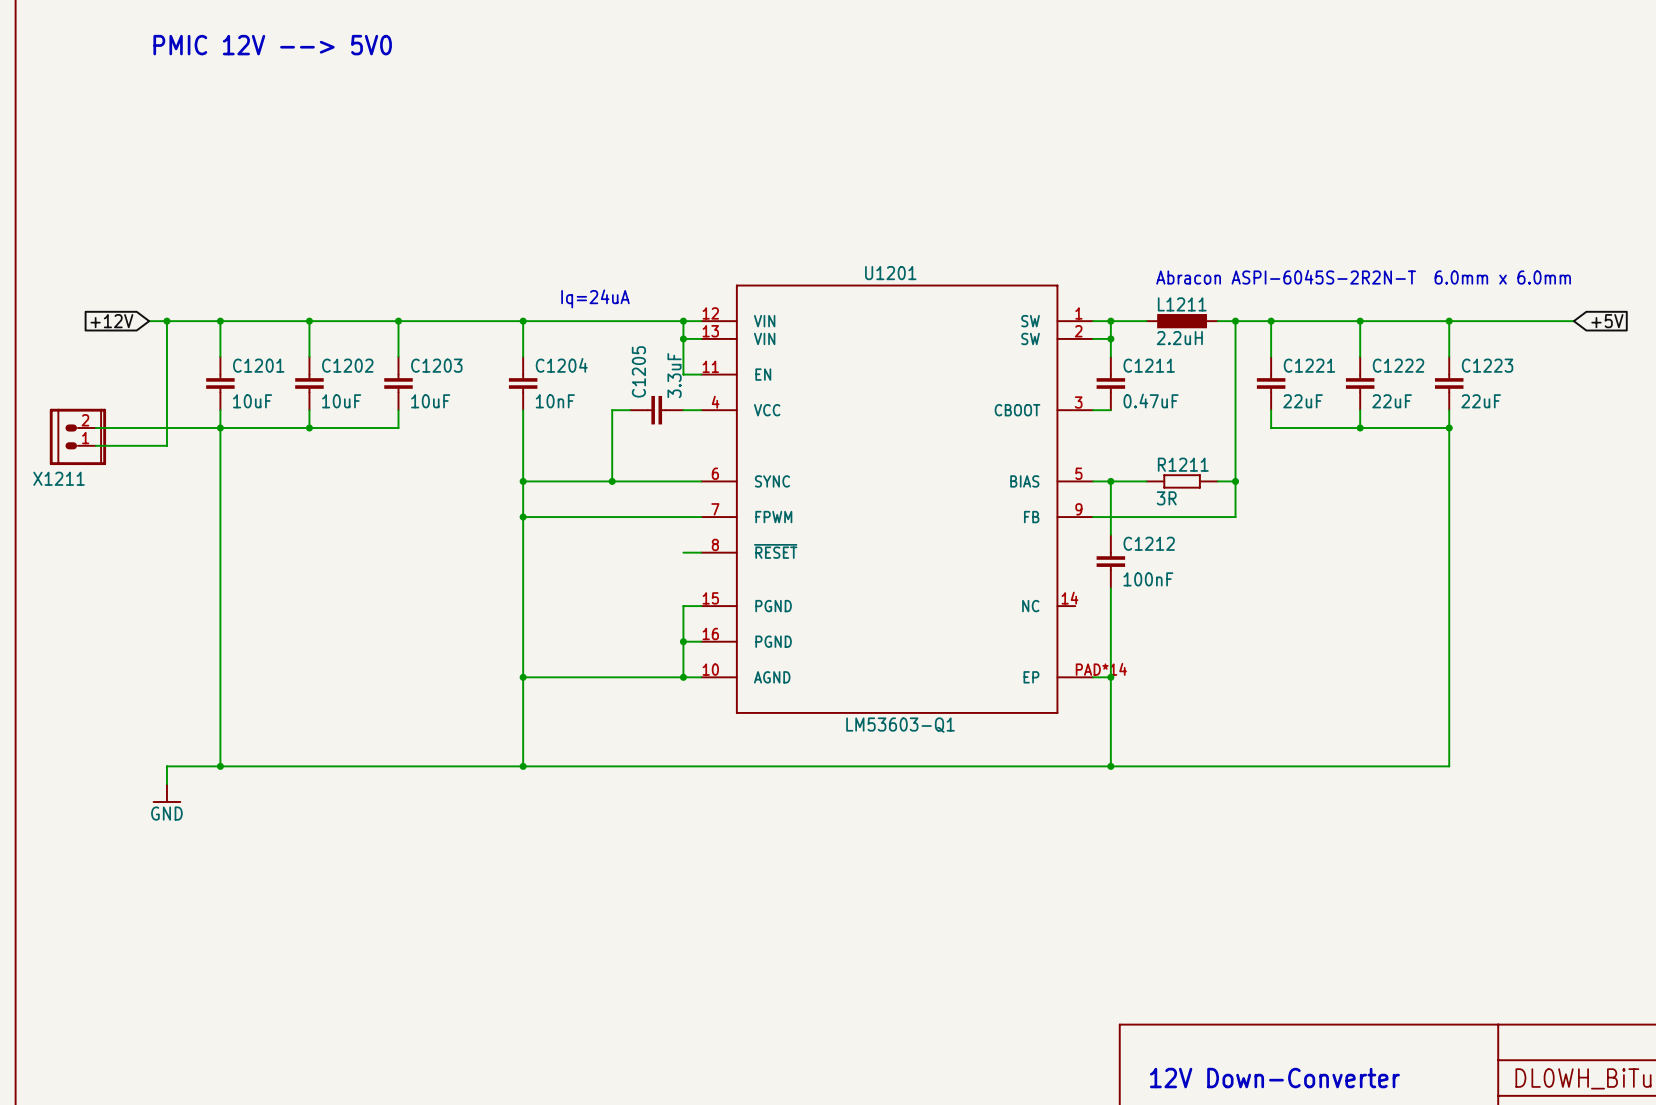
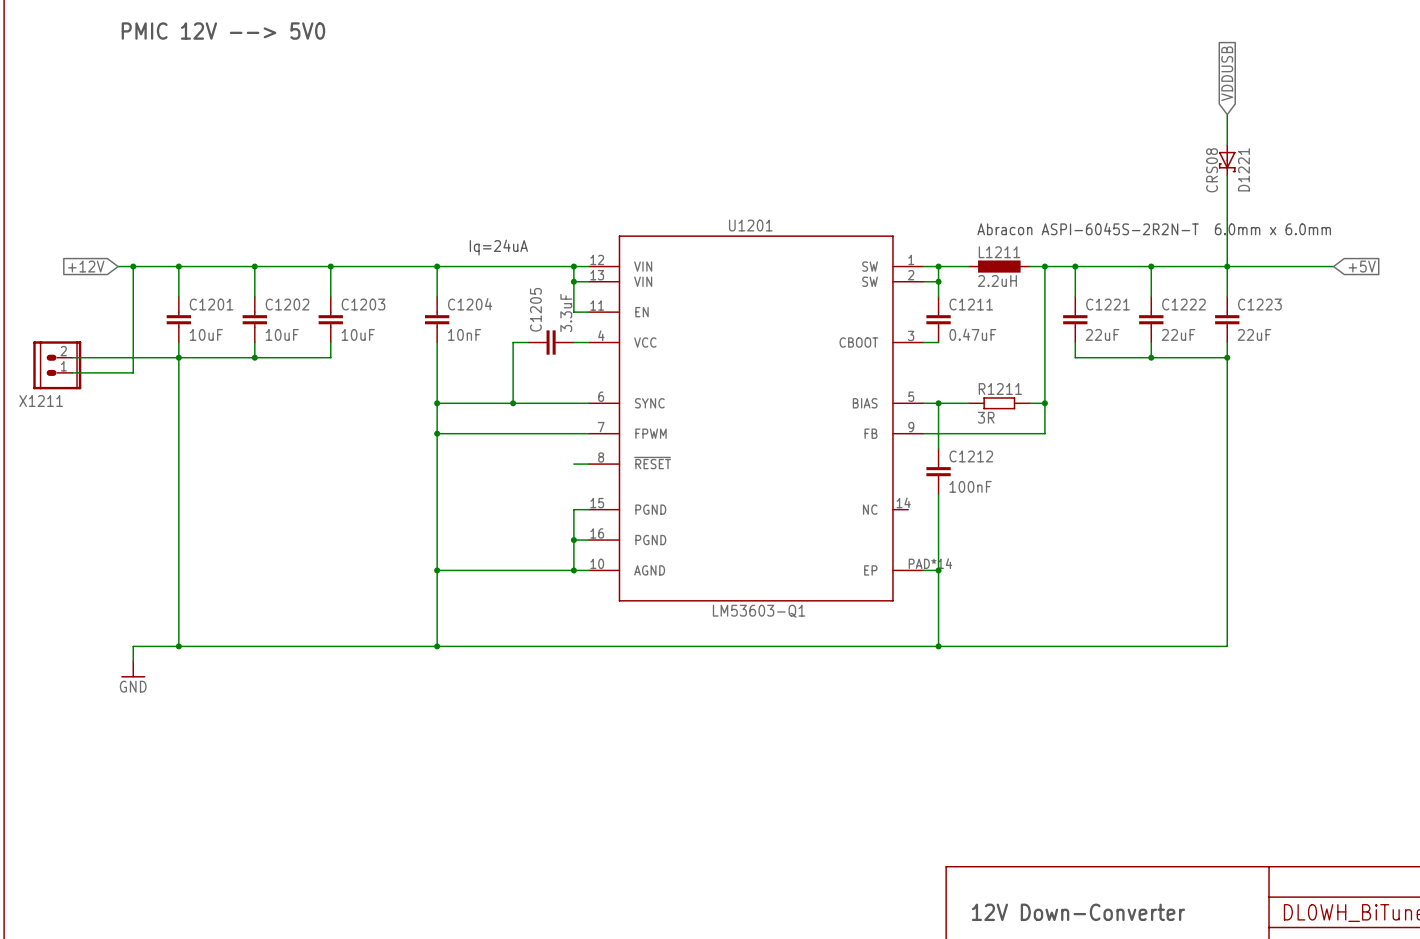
global label: none -> VDDUSB (1227, 73)
wire: none -> (1227, 114) (1227, 144)
D1221: none -> CRS08 (1227, 160)
wire: none -> (1227, 175) (1227, 266)

